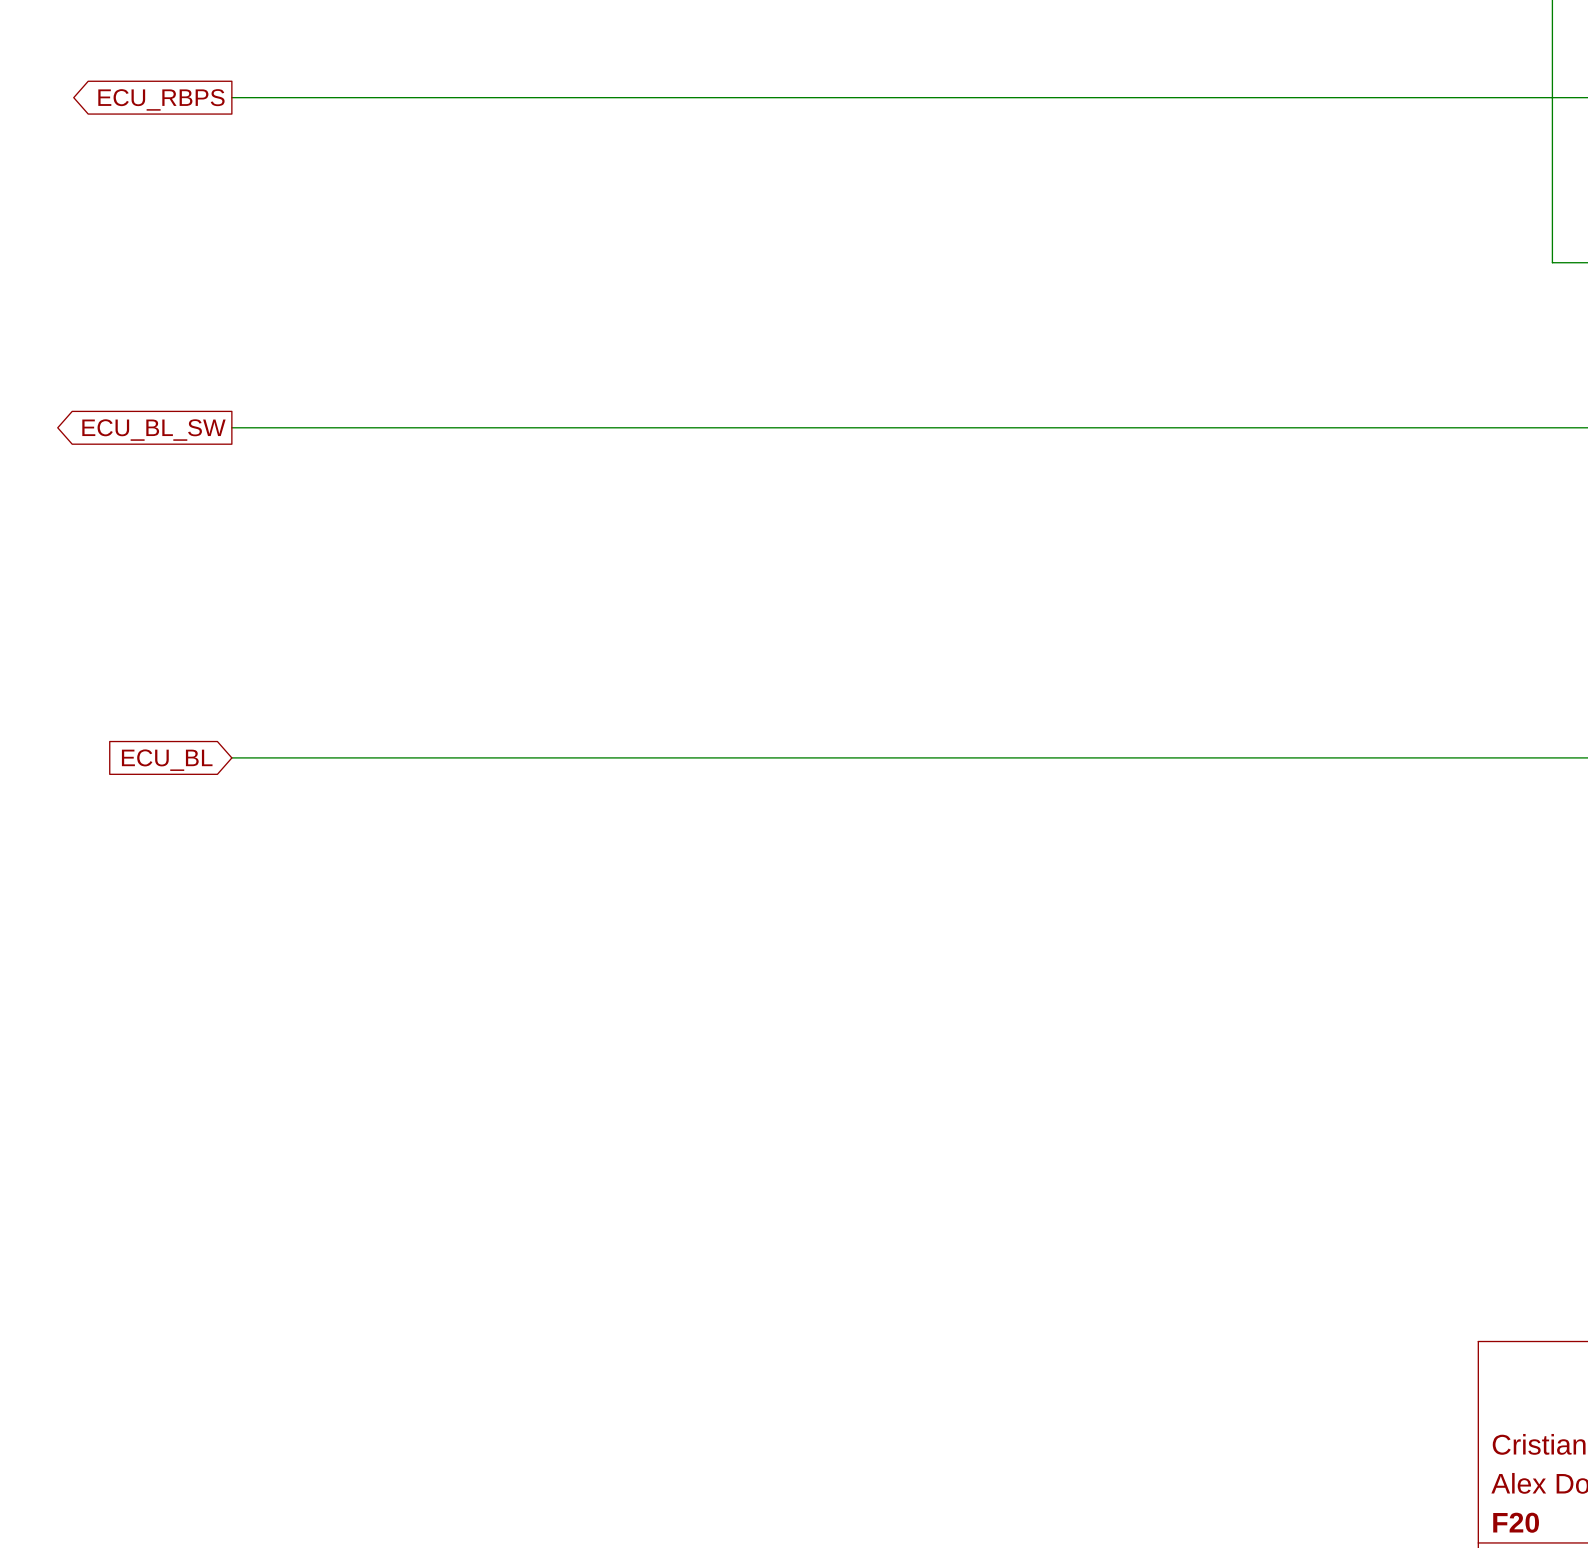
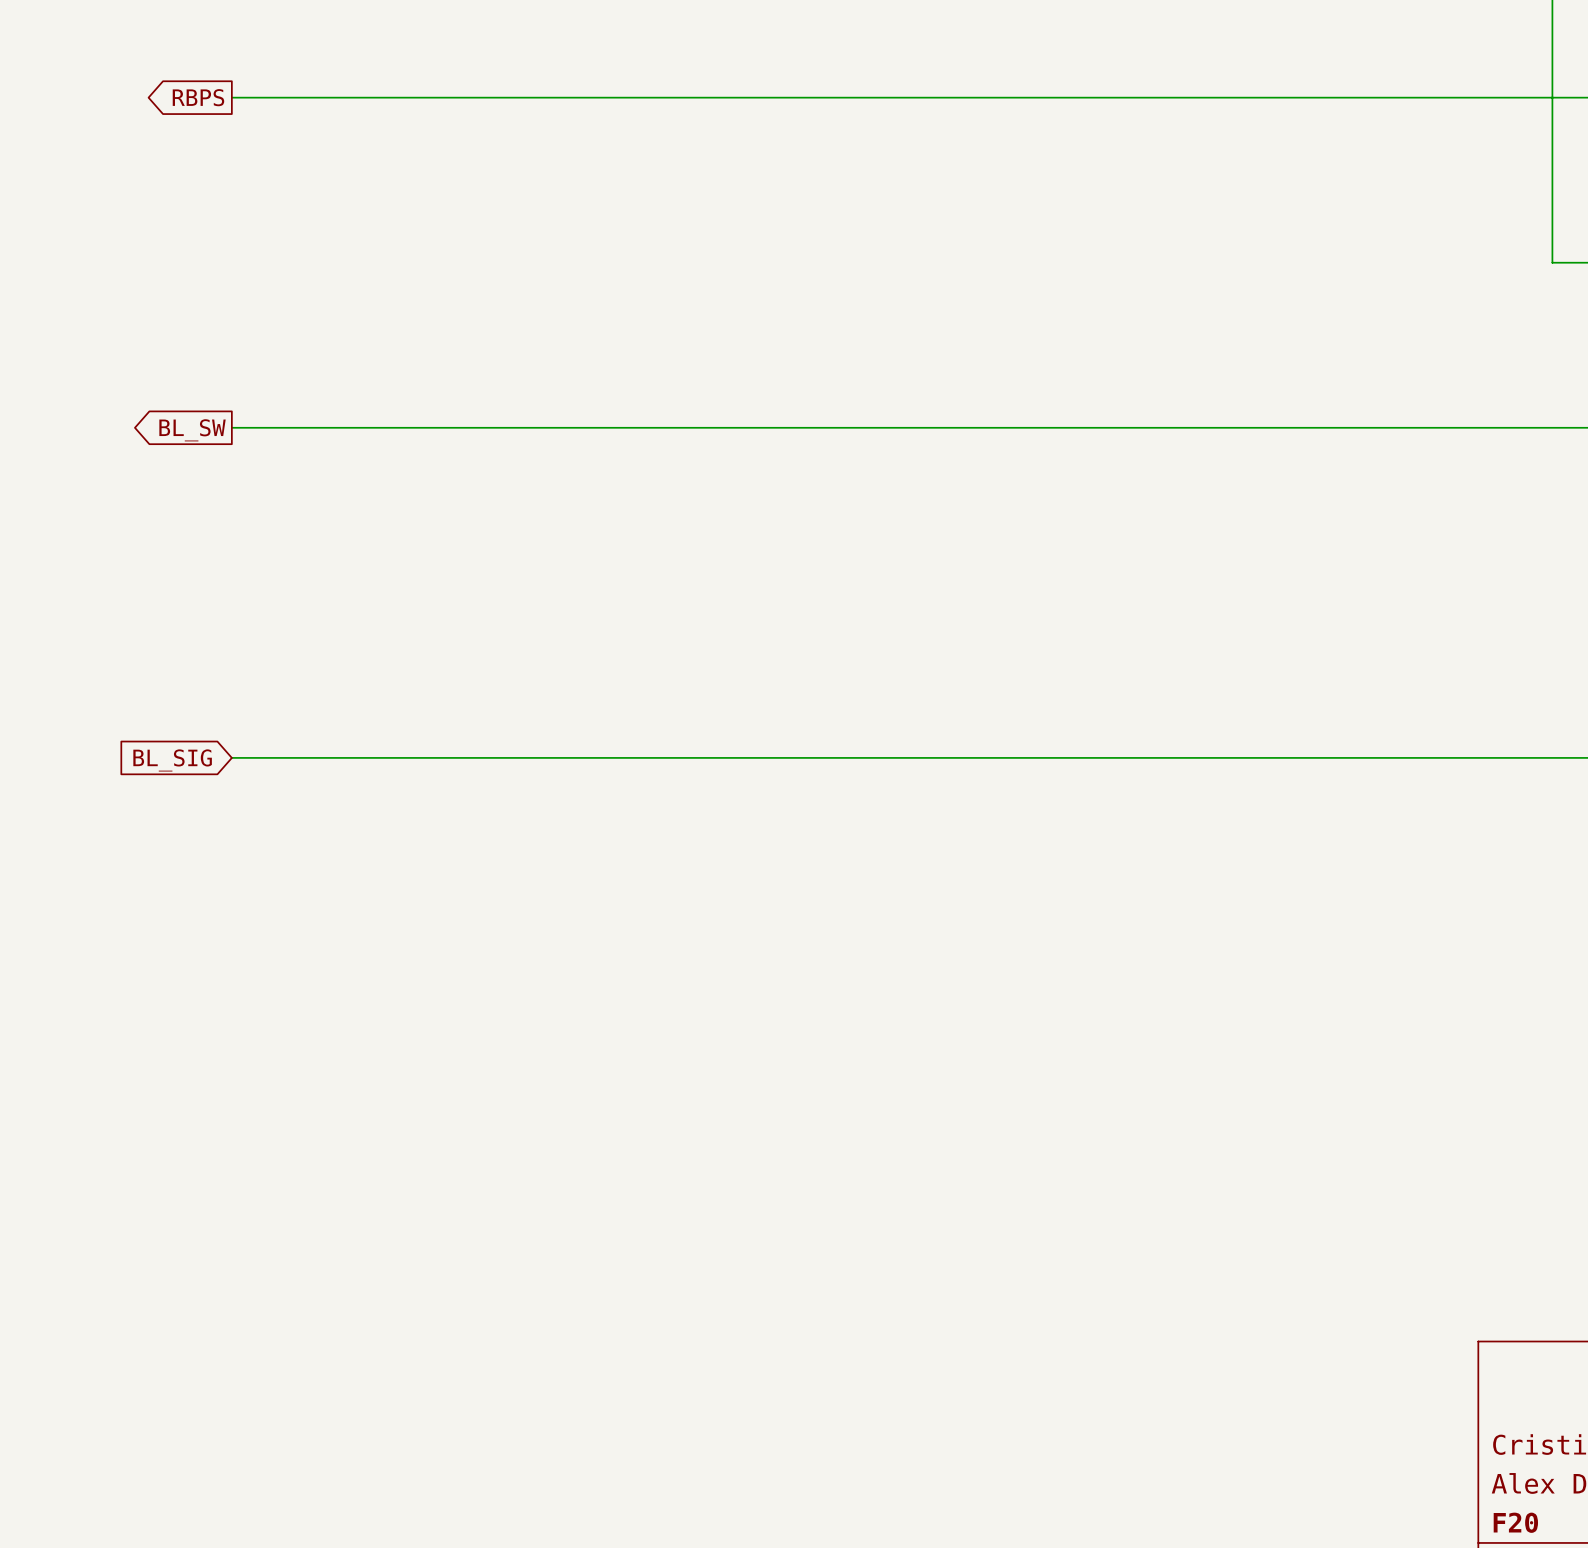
global label: ECU_RBPS (161, 99) -> RBPS (198, 97)
global label: ECU_BL_SW (153, 430) -> BL_SW (192, 430)
global label: ECU_BL (167, 760) -> BL_SIG (172, 760)

